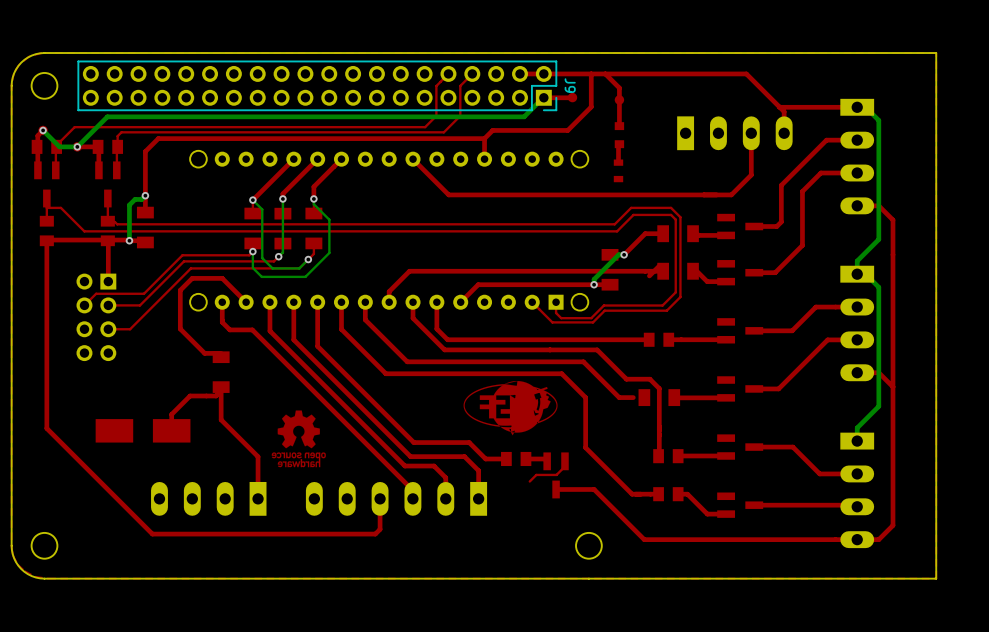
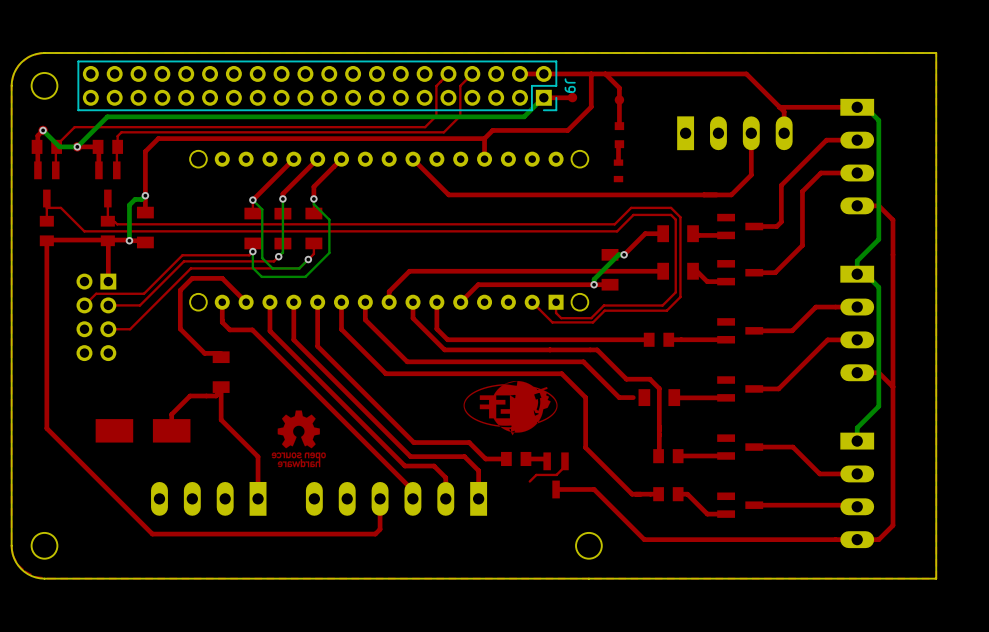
top track: (659, 266) (649, 275) -> none

